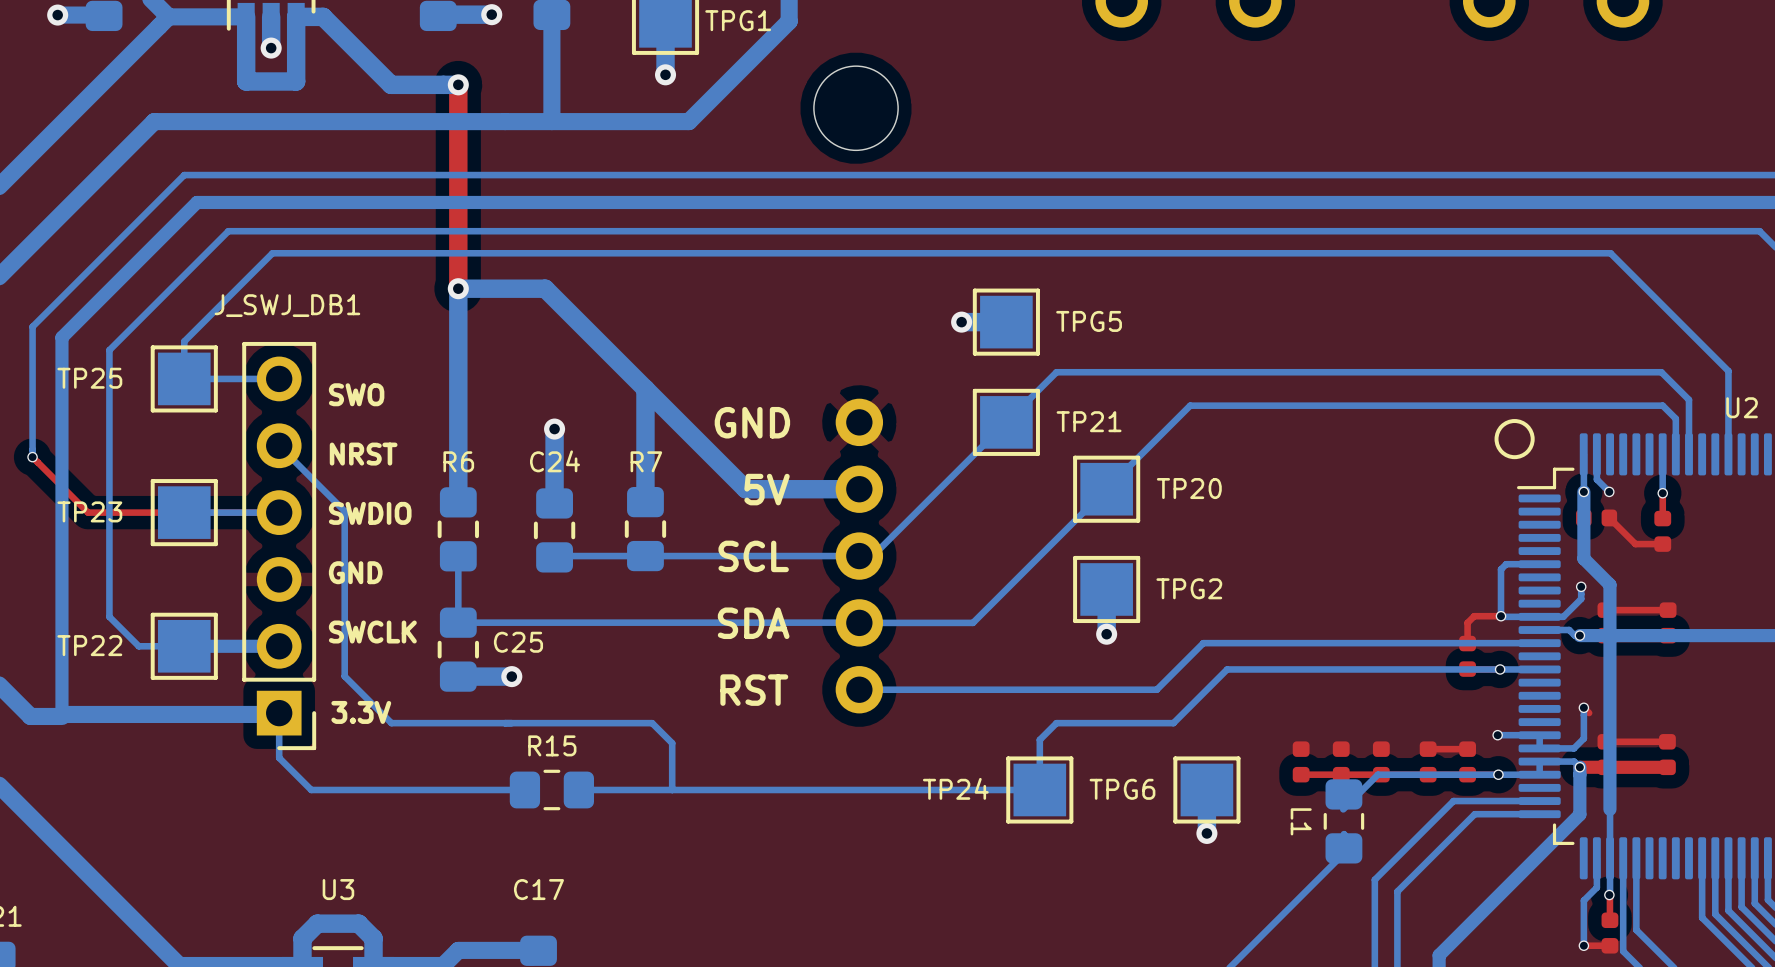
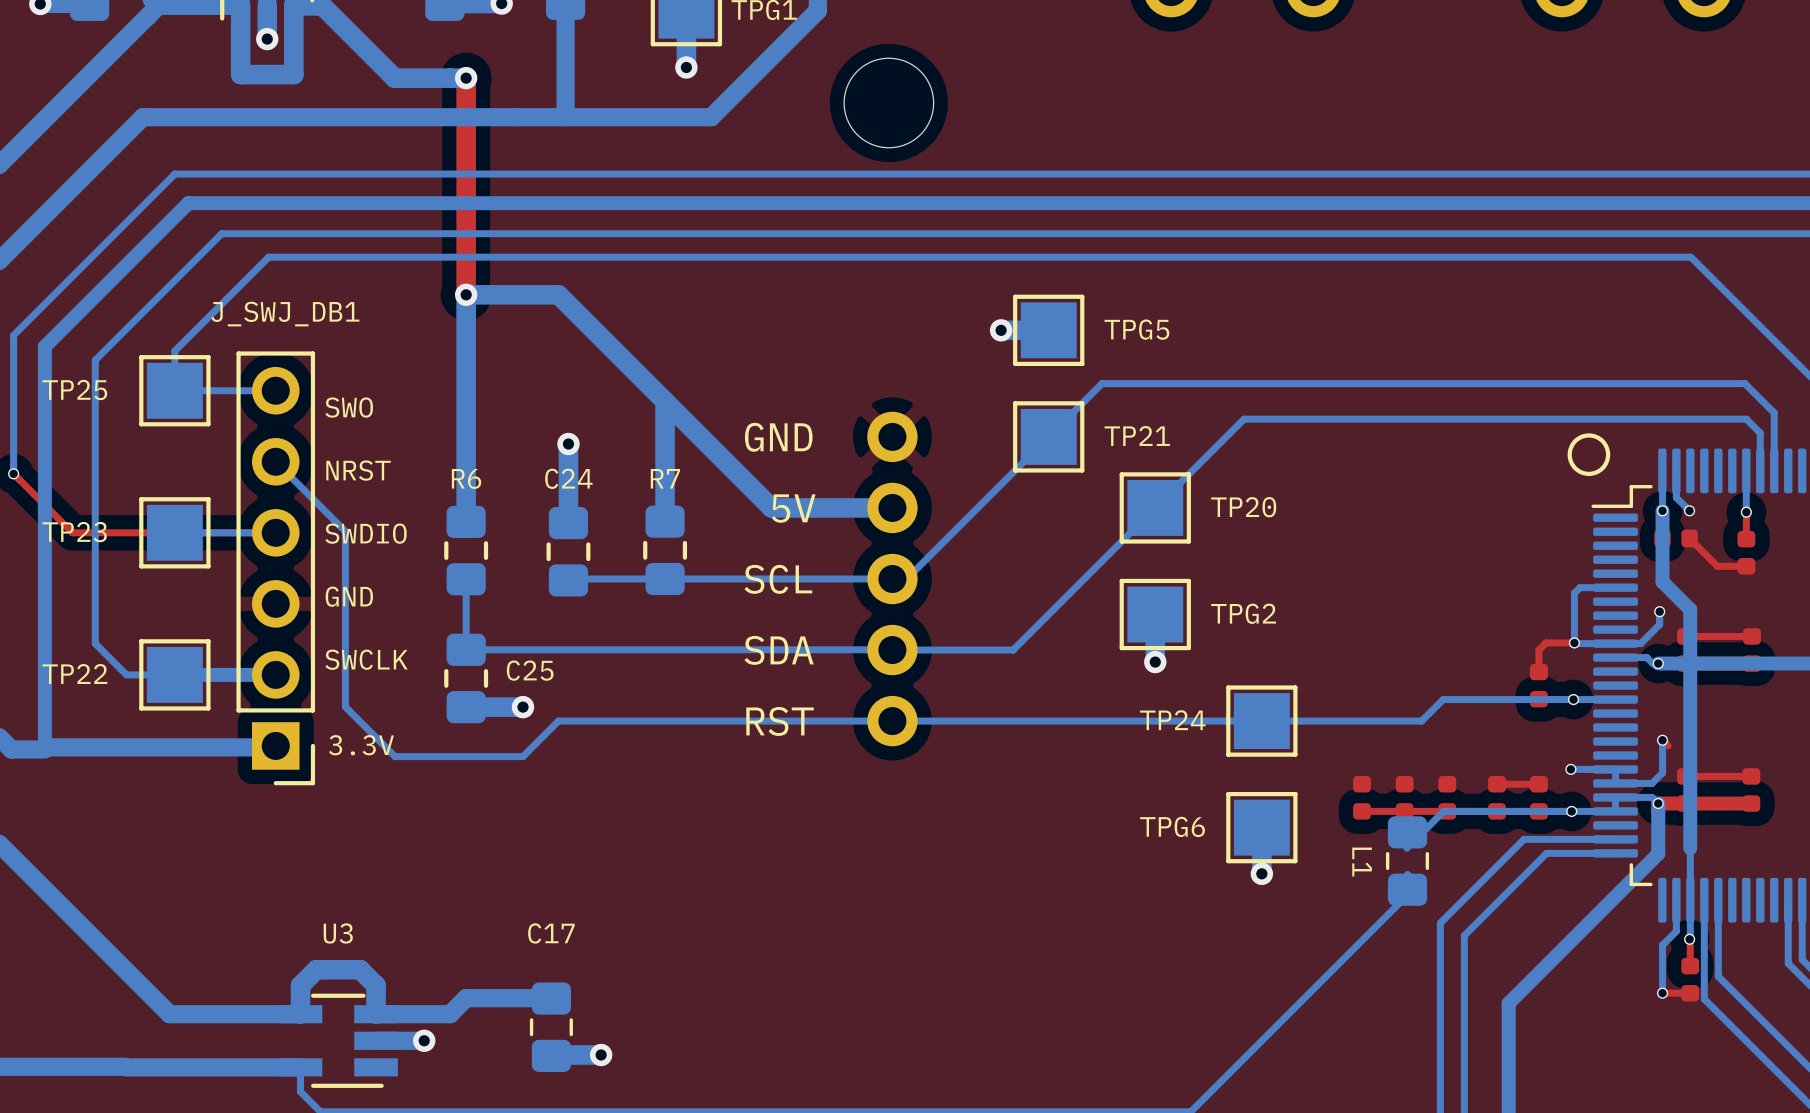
bottom track: (1539, 643) (1203, 643) (1156, 689) -> (1443, 699) (1421, 721) (1208, 721)
bottom track: (1377, 669) (1227, 669) (1173, 723) (1056, 723) (1039, 739) (1039, 789) (578, 789) -> none
bottom track: (279, 713) (279, 757) (311, 789) (524, 789) -> none
bottom track: (511, 723) (652, 723) (672, 743) (672, 789) -> (523, 756) (558, 721) (892, 721)
R15: (551, 789) -> none
TP24 position: (1039, 789) -> (1261, 721)

